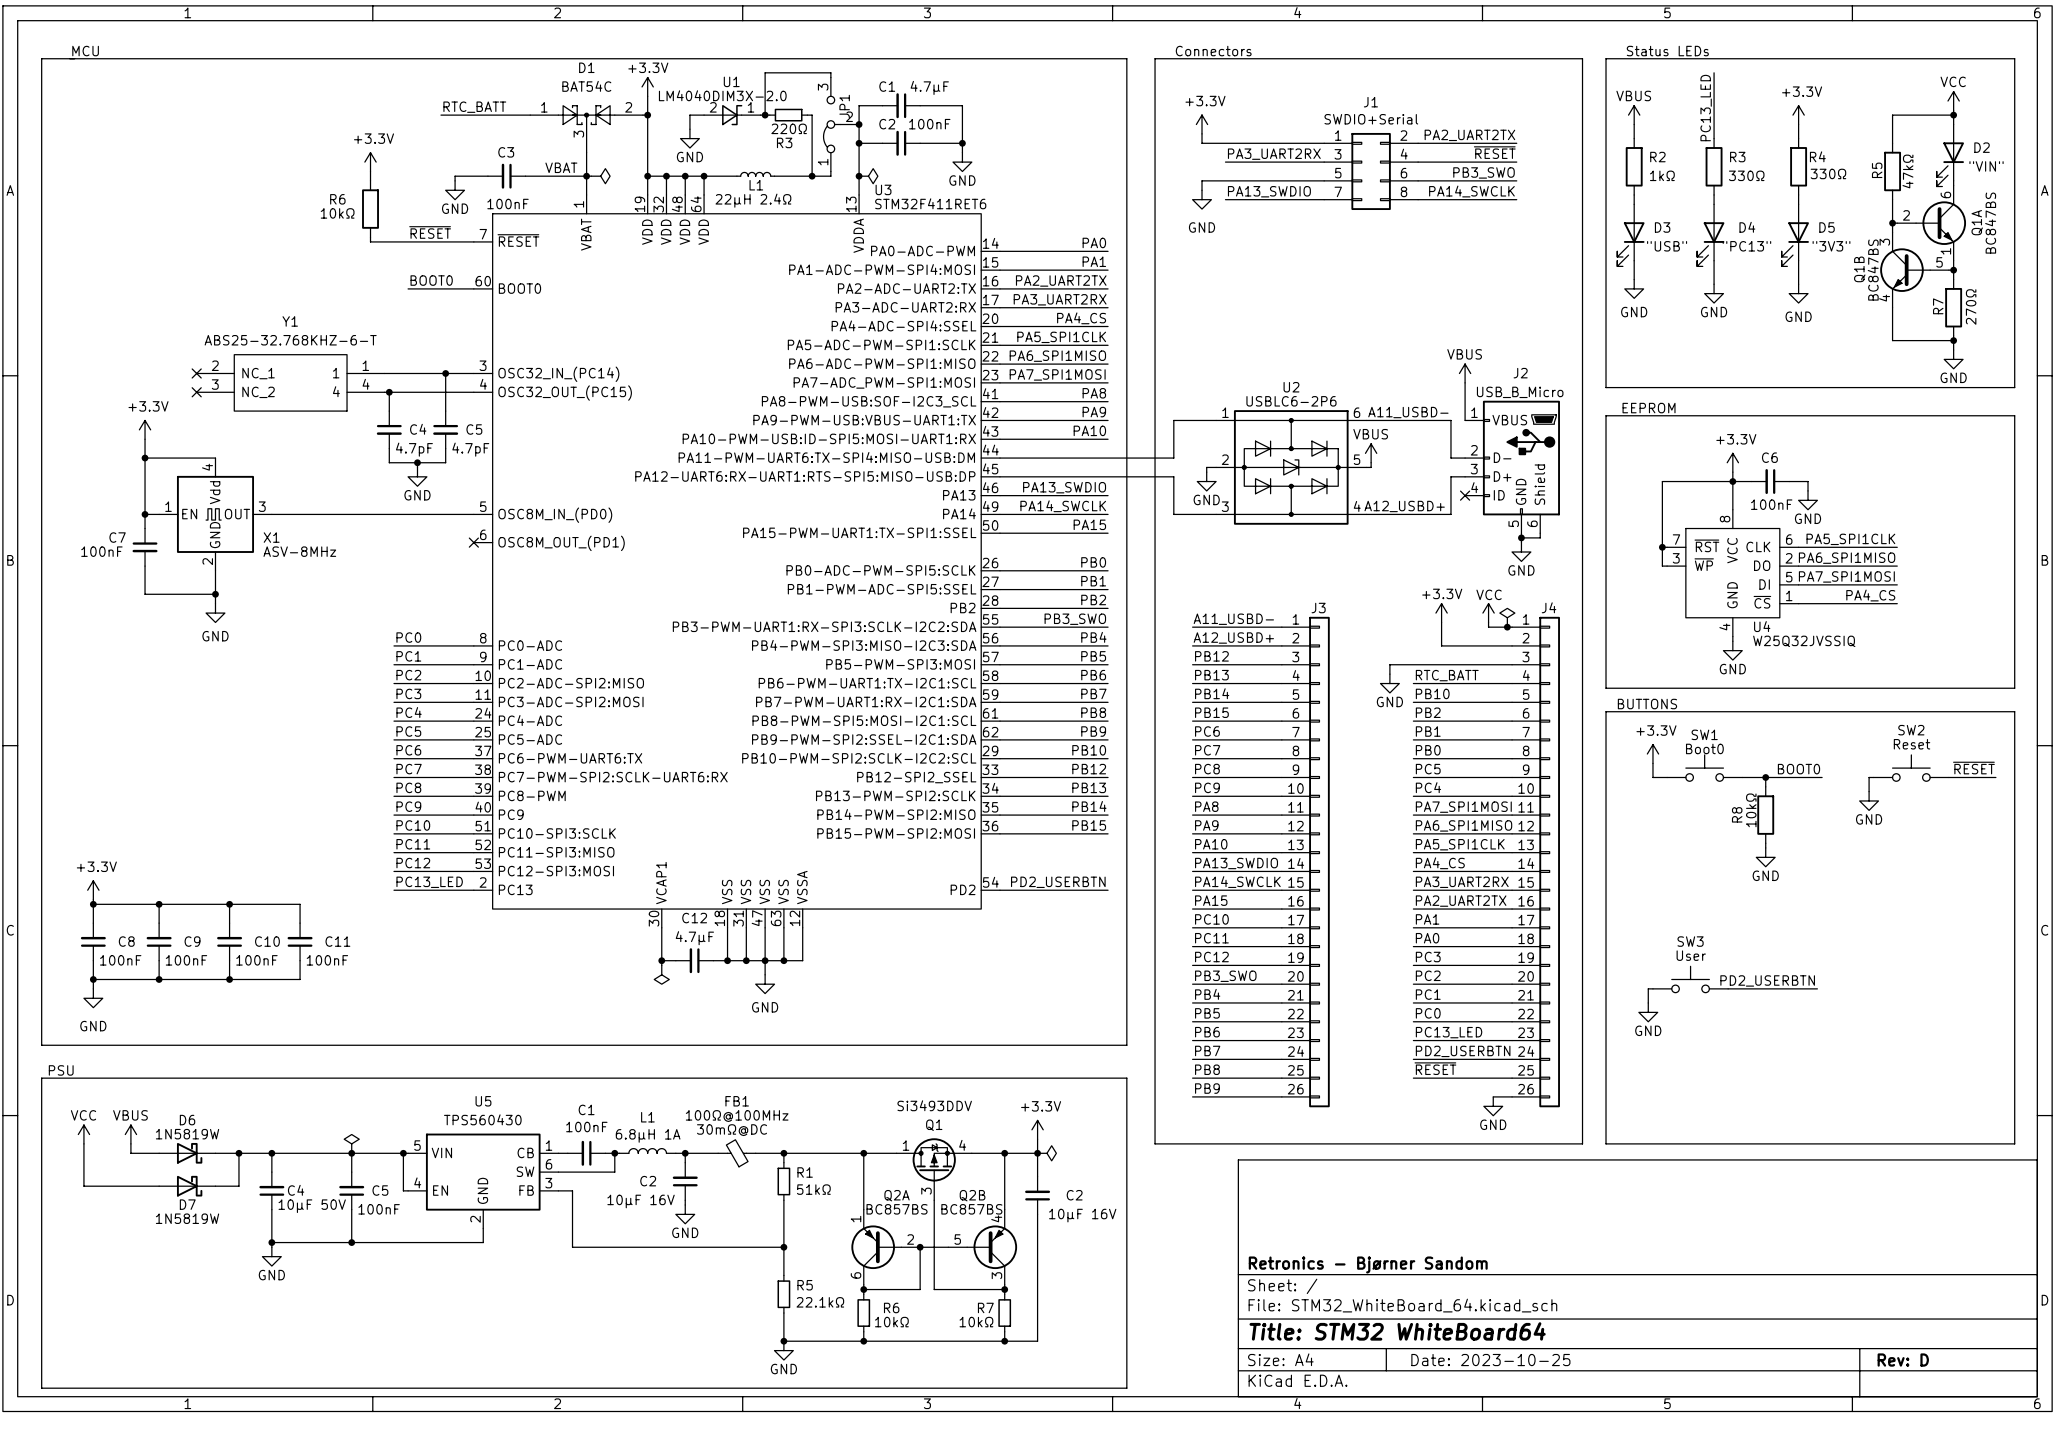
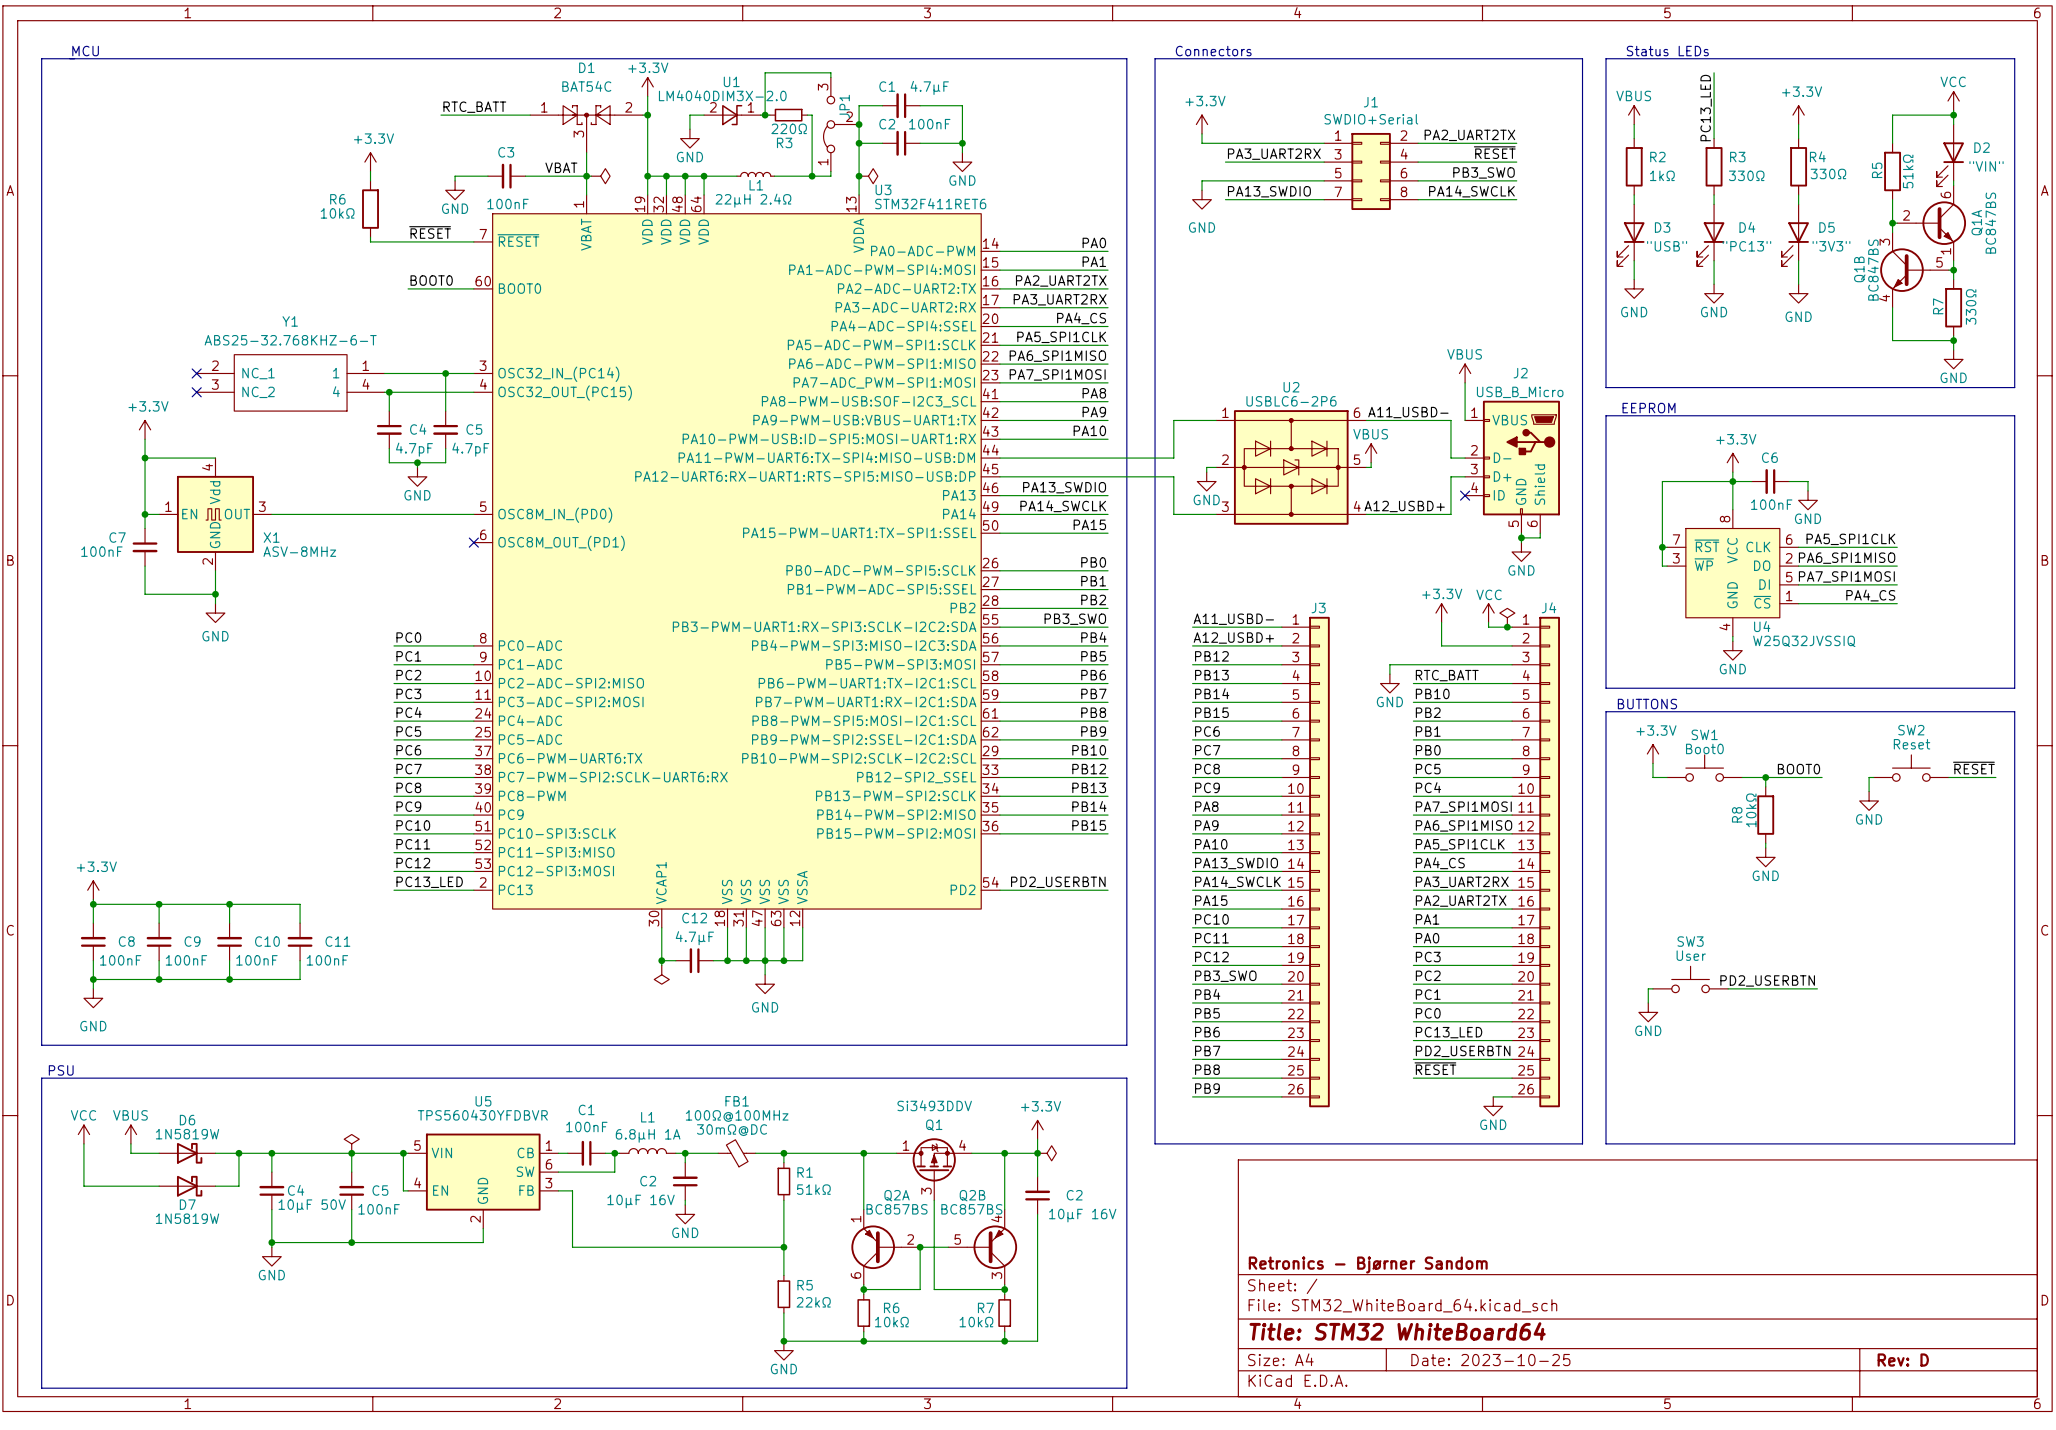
R5 value: 47kΩ (1907, 171) -> 51kΩ (1908, 171)
R7 value: 270Ω (1971, 307) -> 330Ω (1971, 307)
U5 value: TPS560430 (482, 1119) -> TPS560430YFDBVR (482, 1115)
R5 value: 22.1kΩ (820, 1302) -> 22kΩ (813, 1302)

